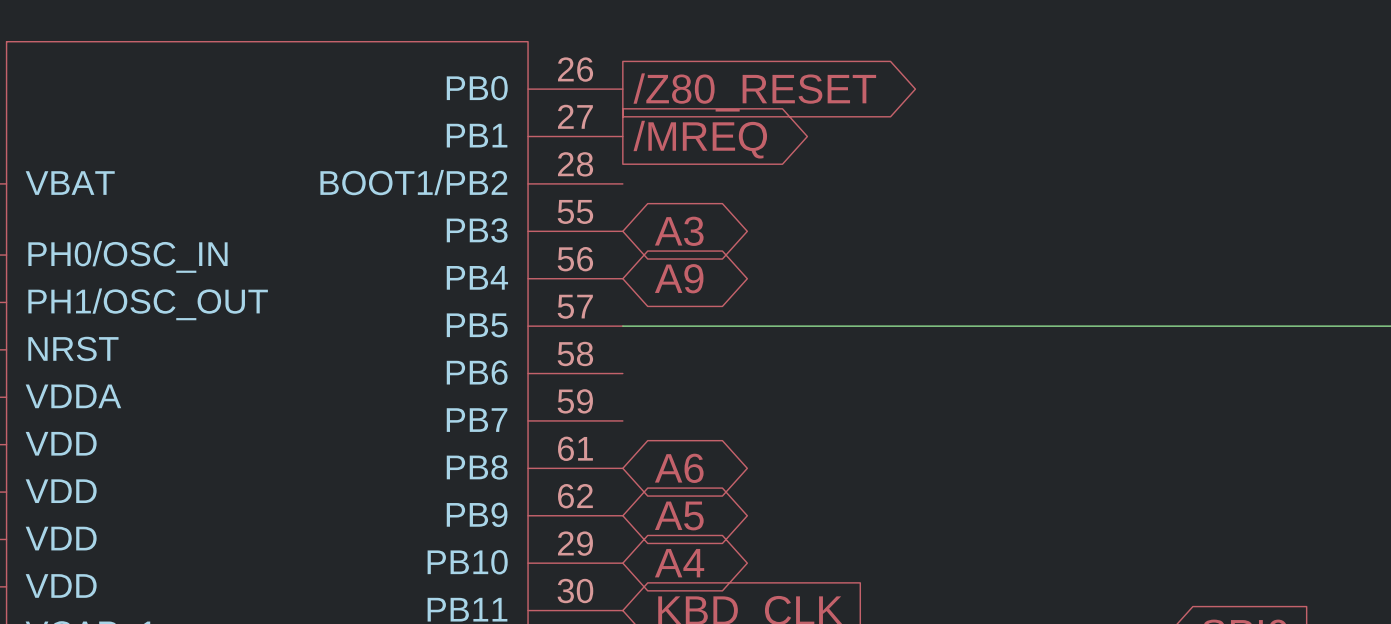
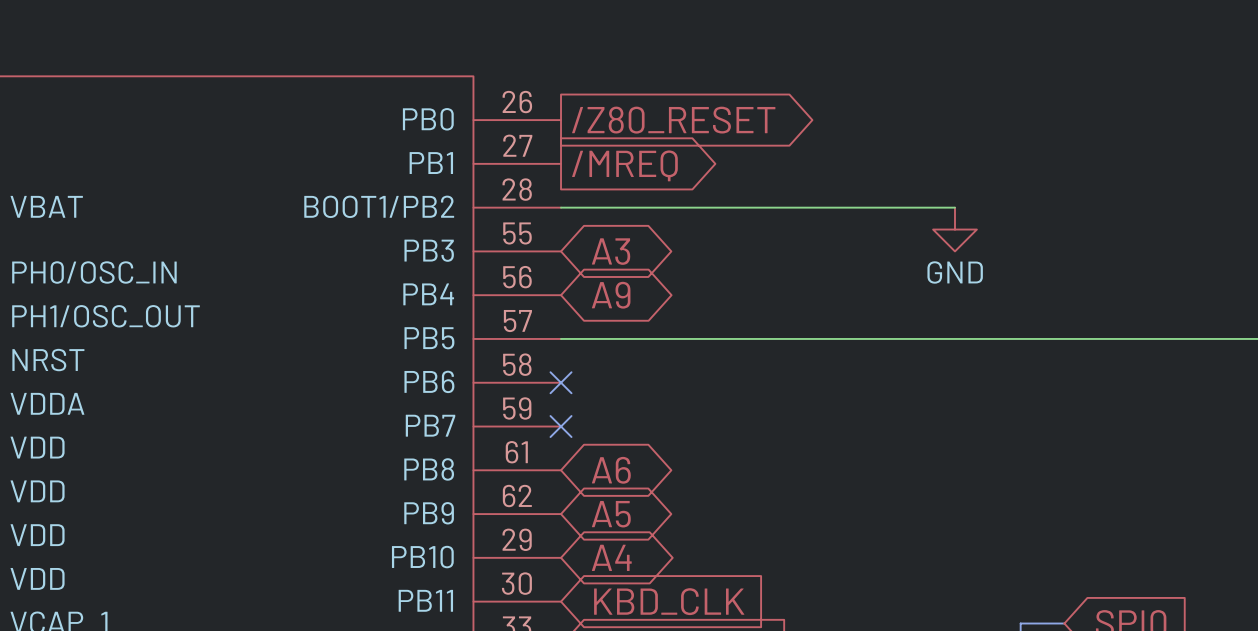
wire: none -> (561, 207) (954, 207)
power symbol: none -> GND (954, 229)
no-connect mark: none -> (561, 382)
no-connect mark: none -> (561, 426)

